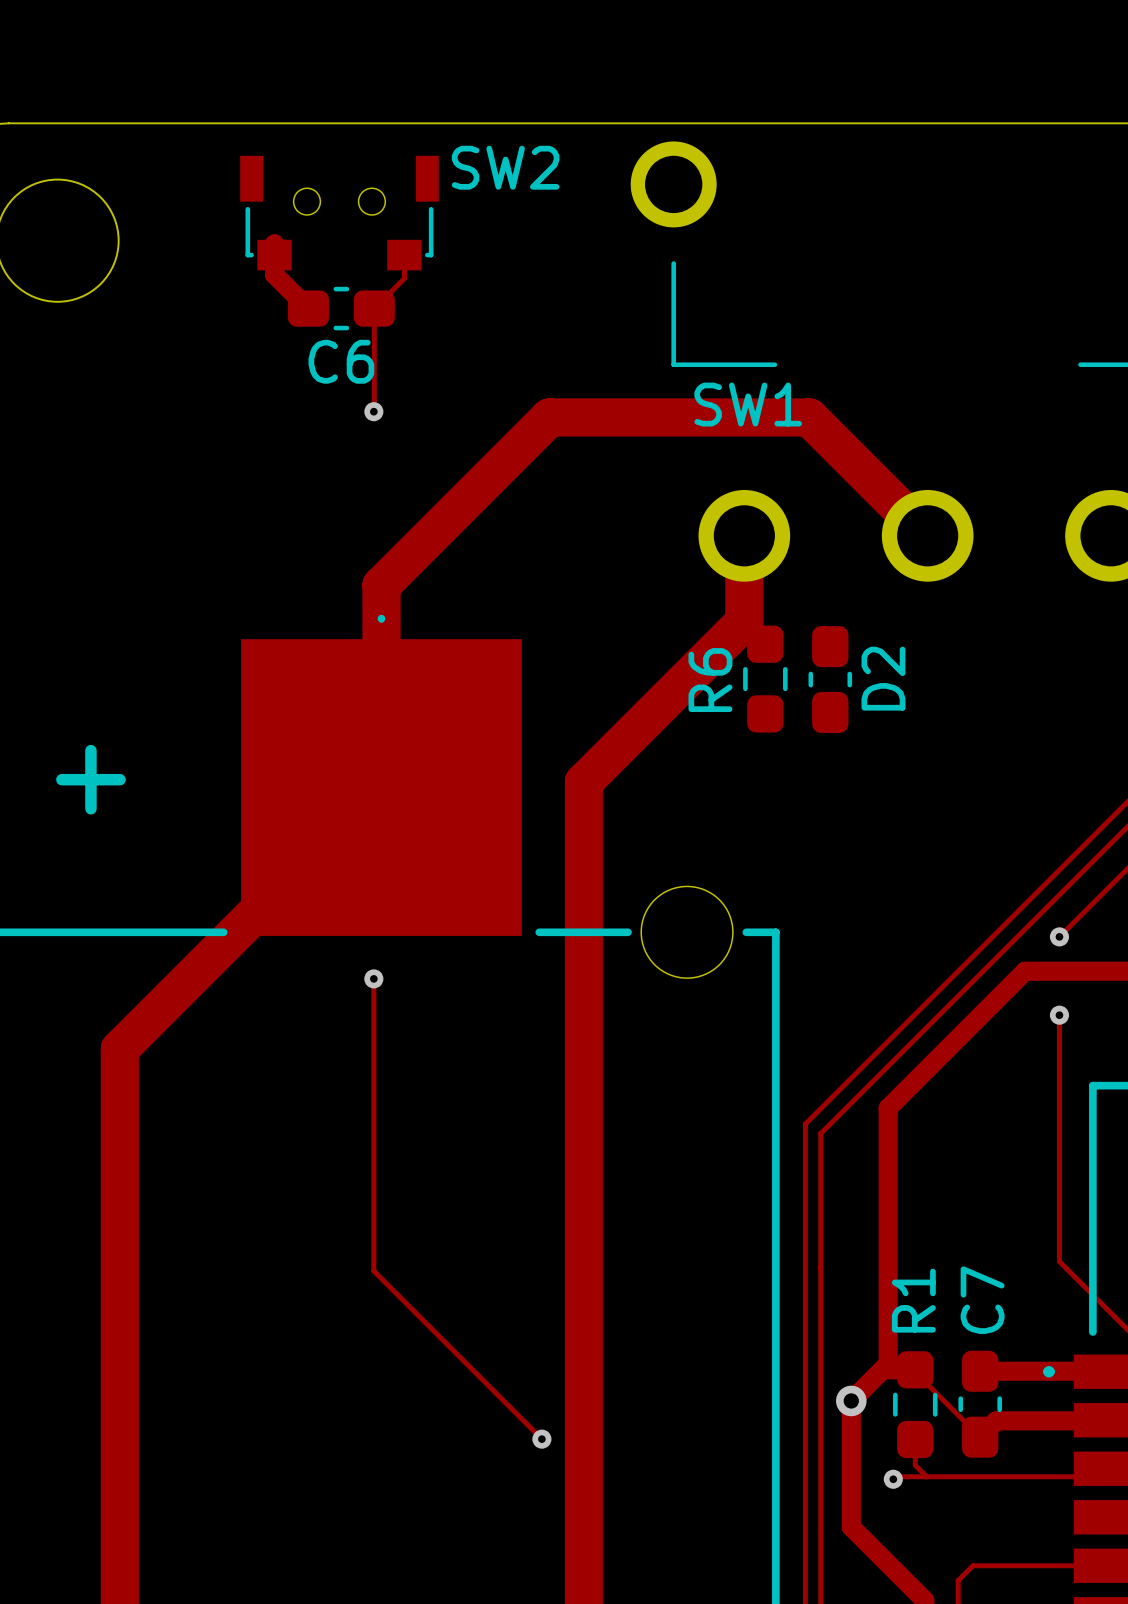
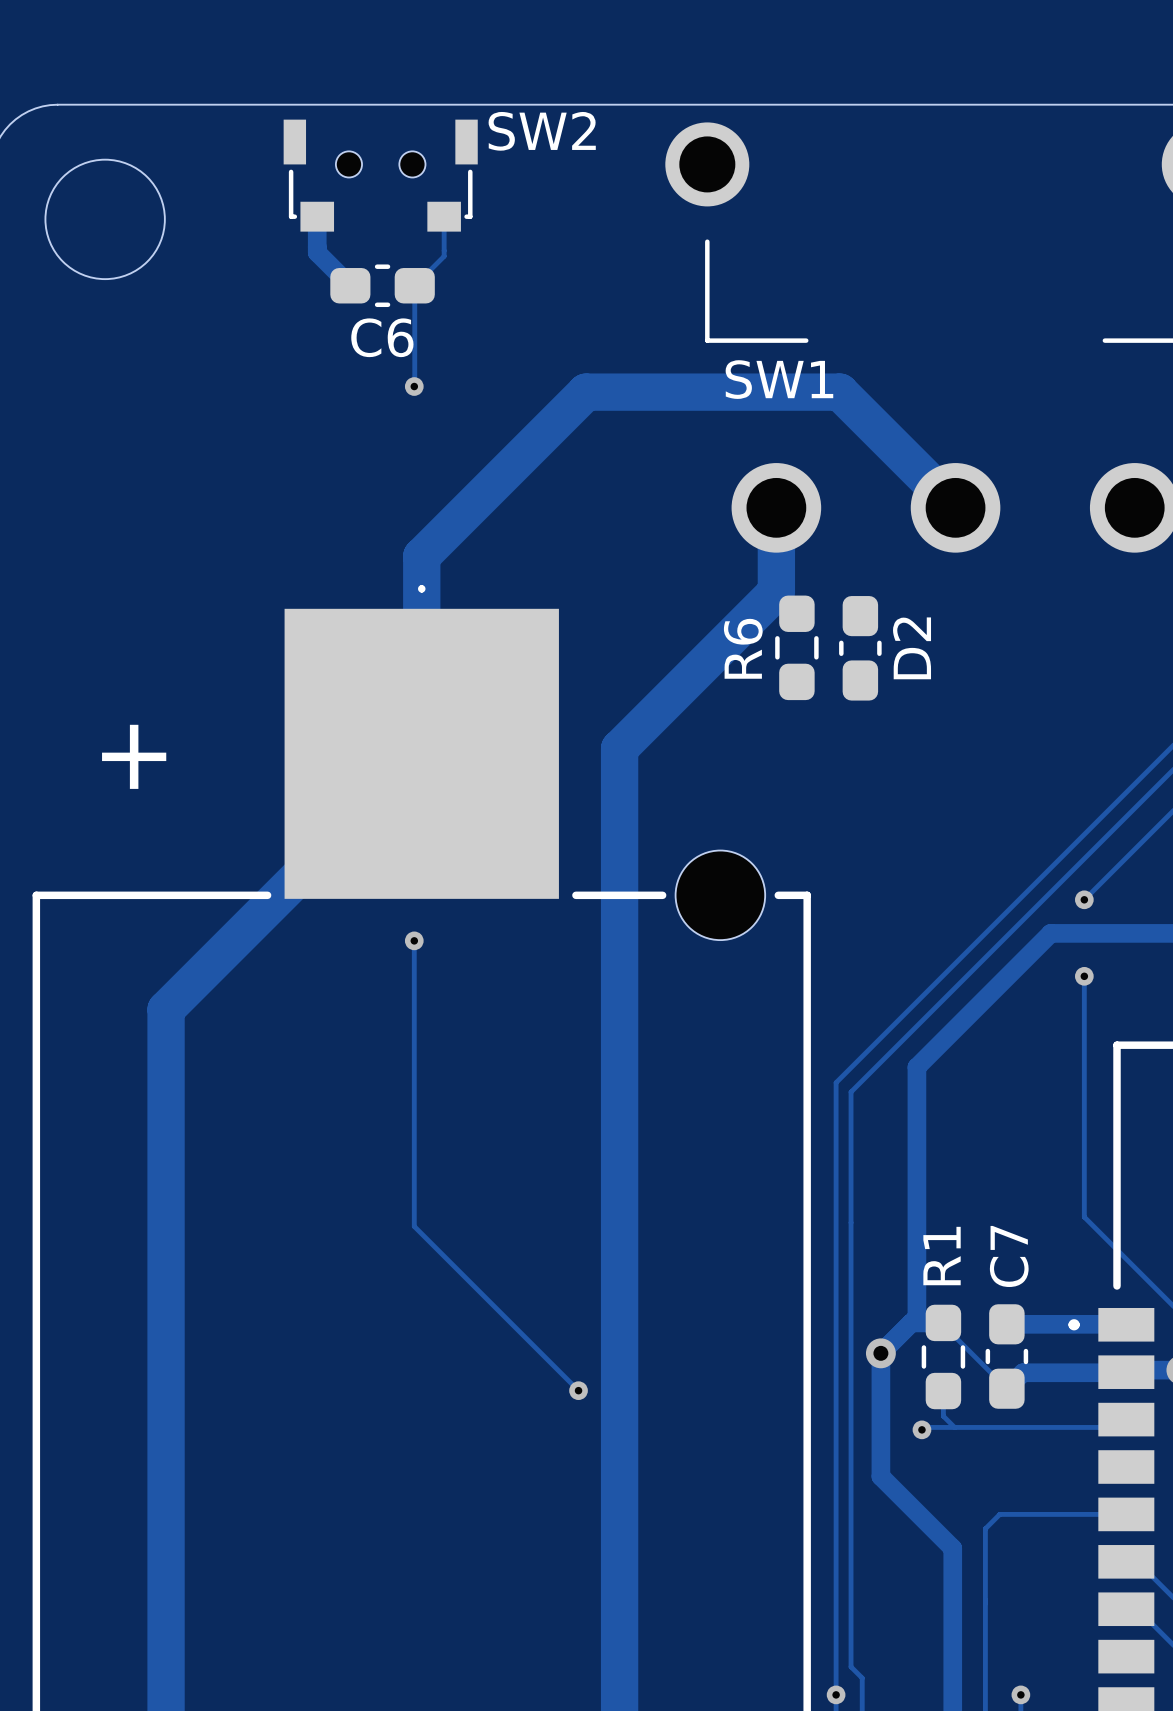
SW2 position: (339, 213) -> (380, 175)

